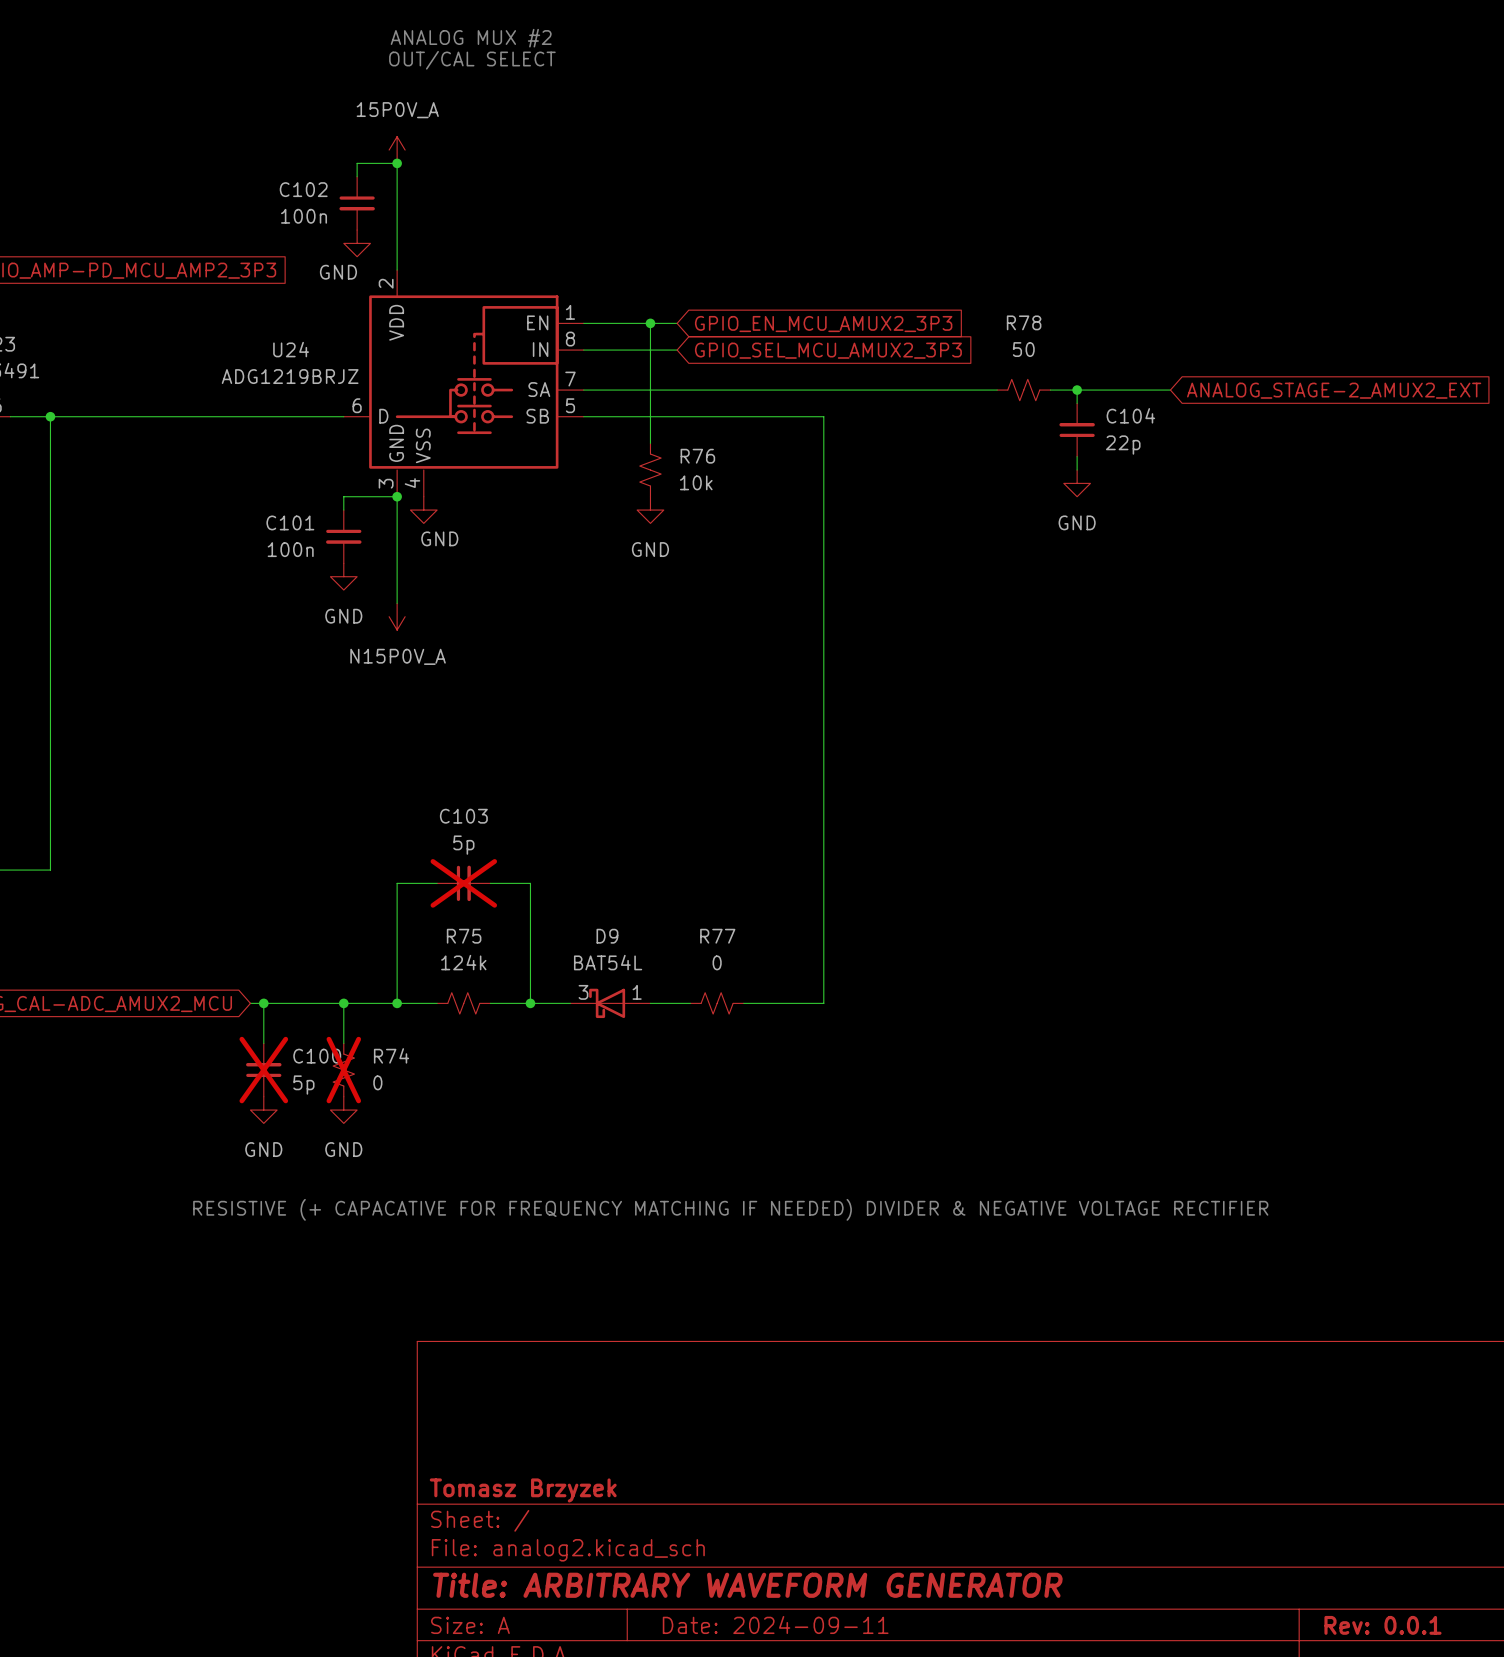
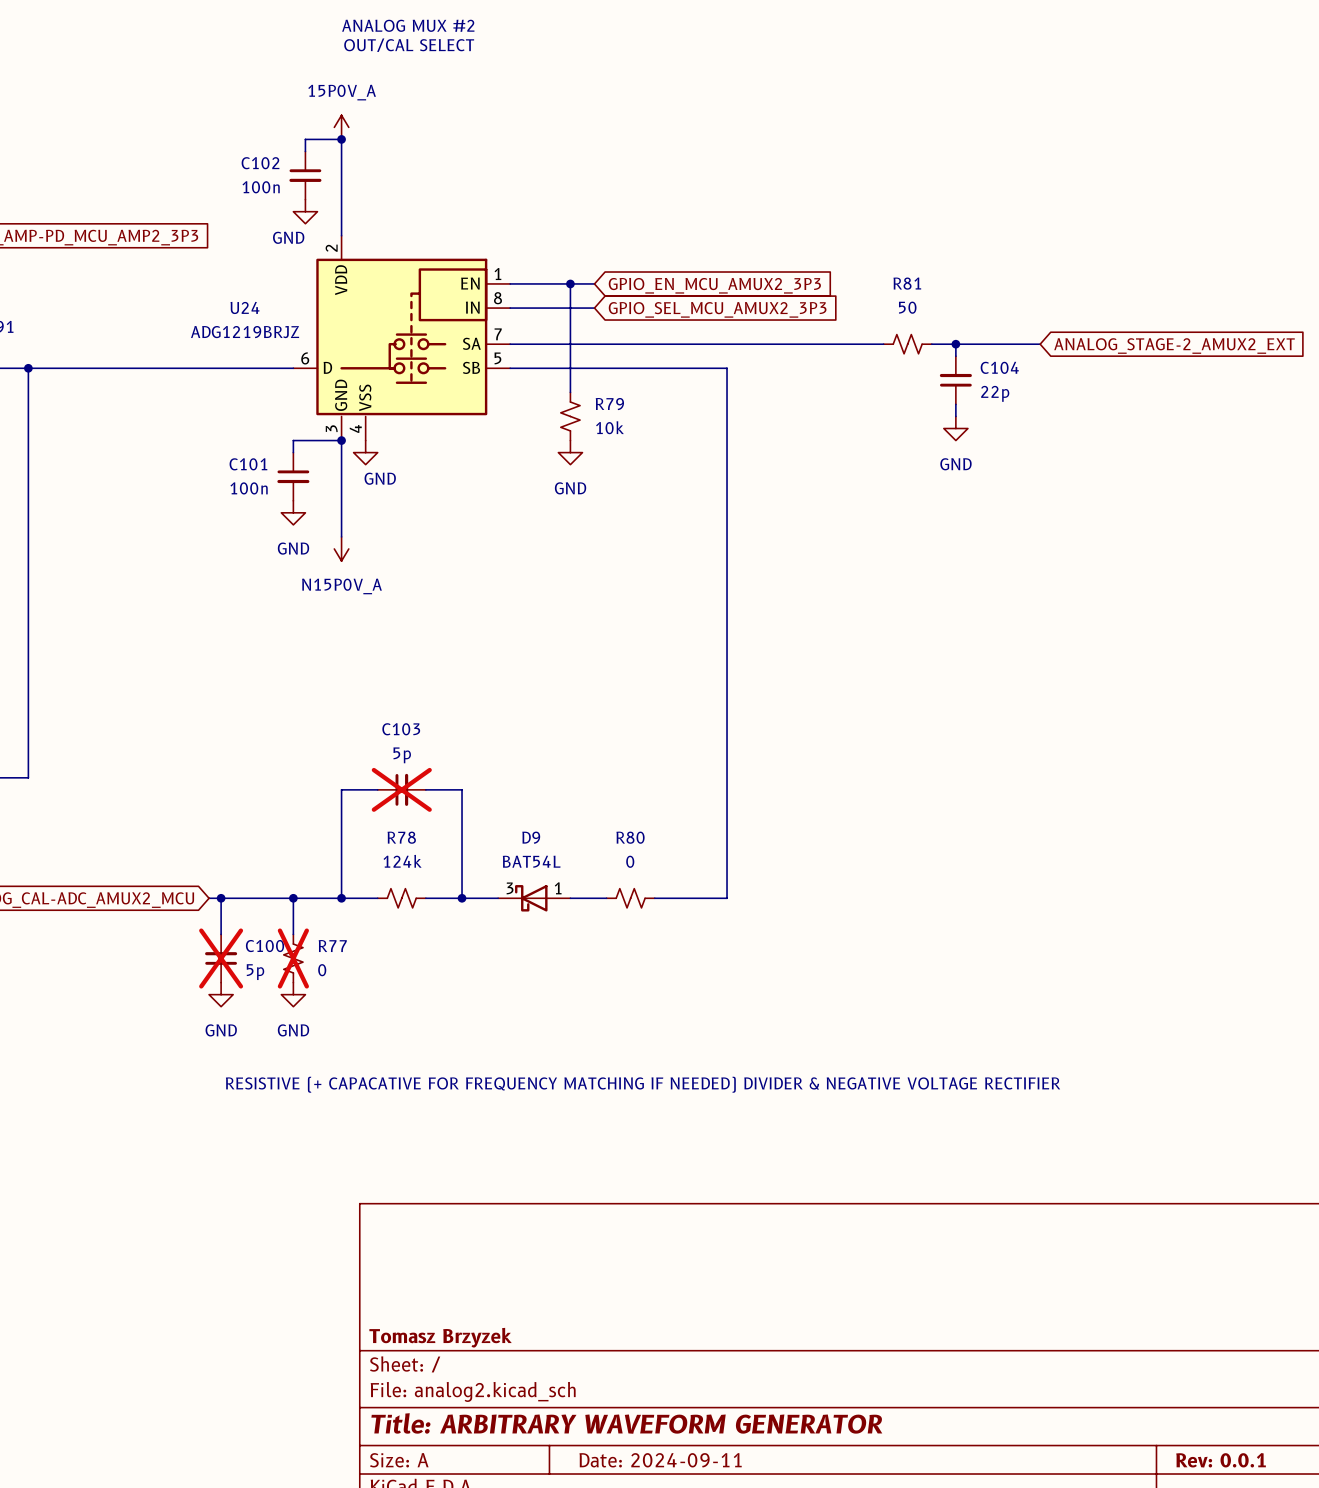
R78 name: R78 (1024, 322) -> R81 (907, 283)
R76 name: R76 (697, 456) -> R79 (609, 404)
R75 name: R75 (464, 936) -> R78 (401, 837)
R77 name: R77 (717, 936) -> R80 (630, 837)
R74 name: R74 (391, 1055) -> R77 (332, 946)

